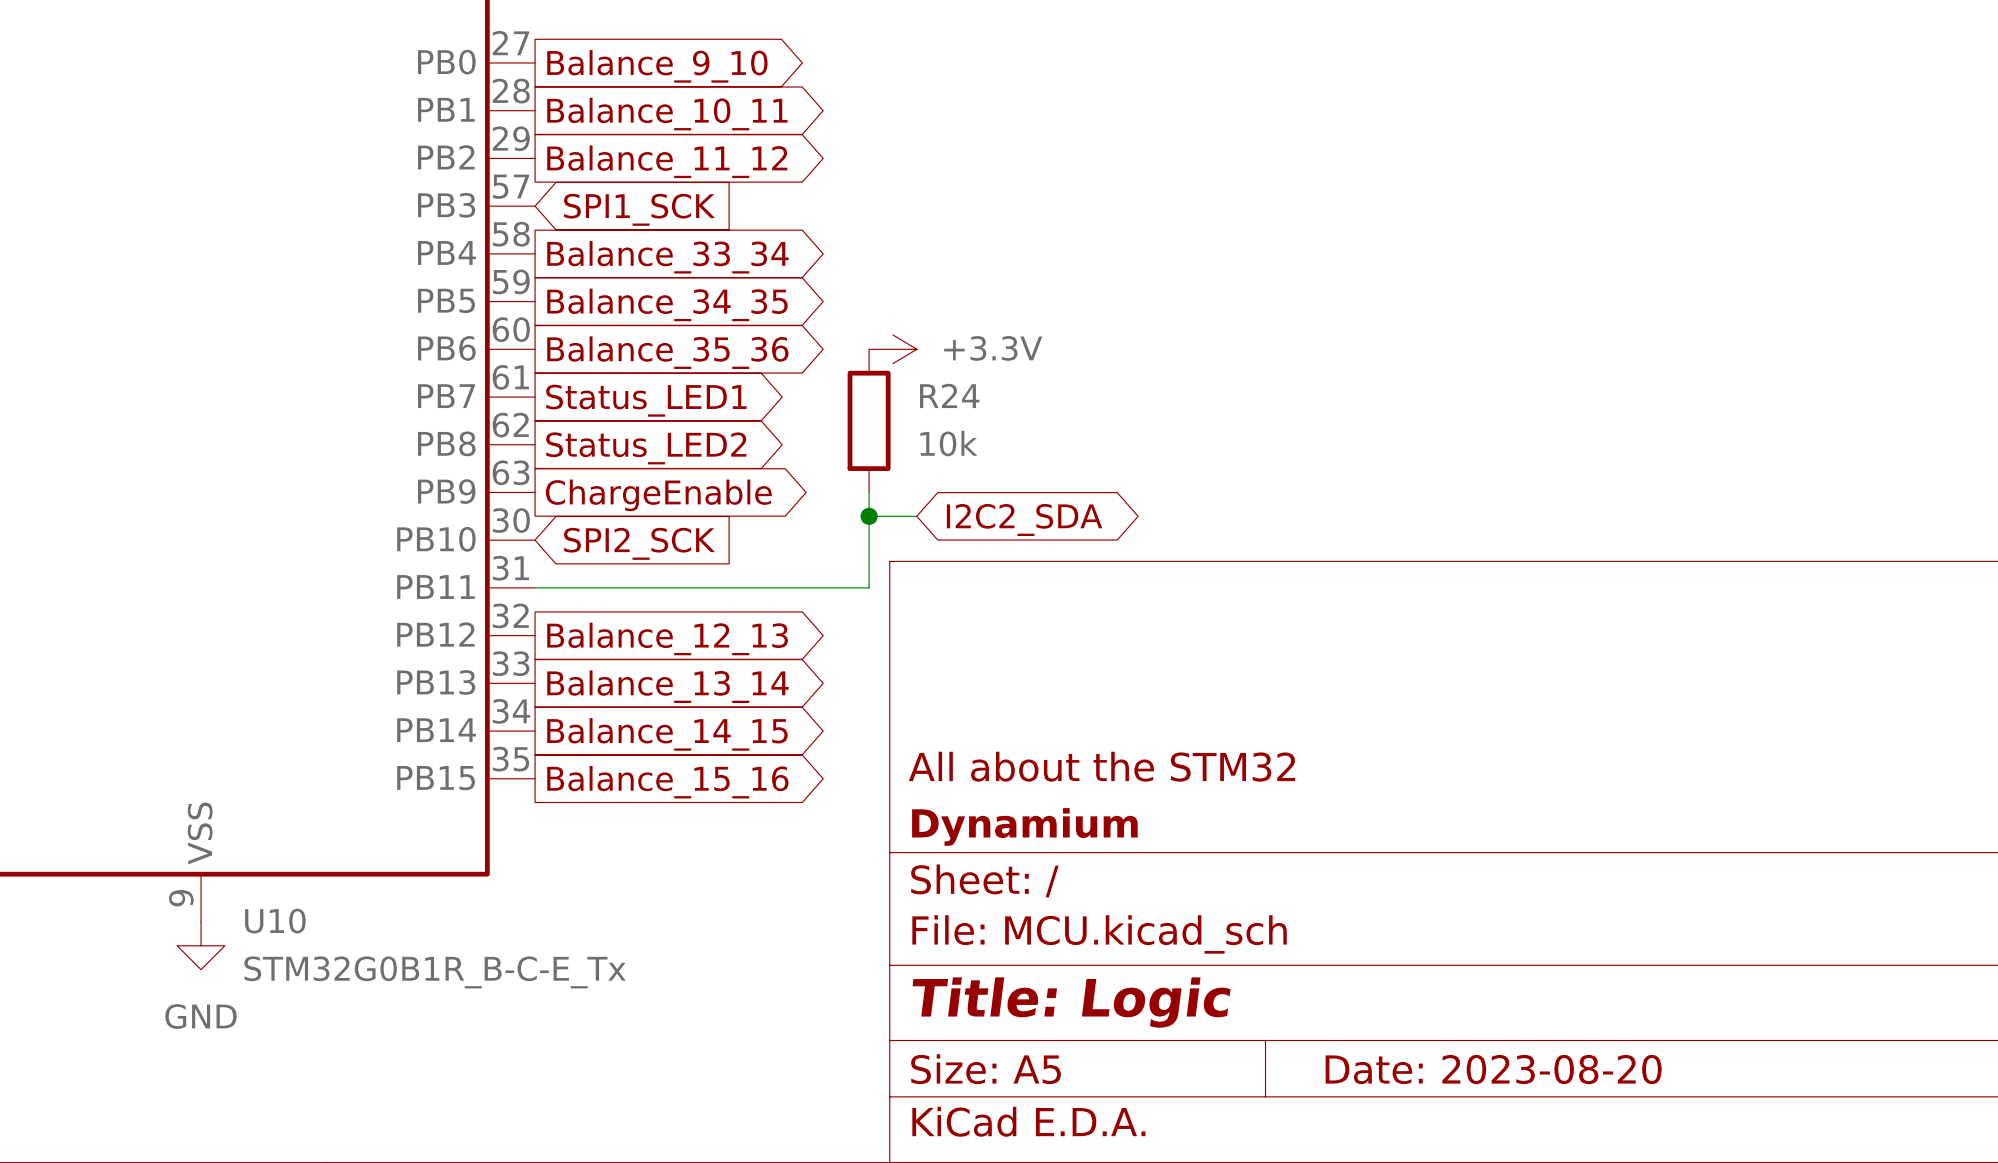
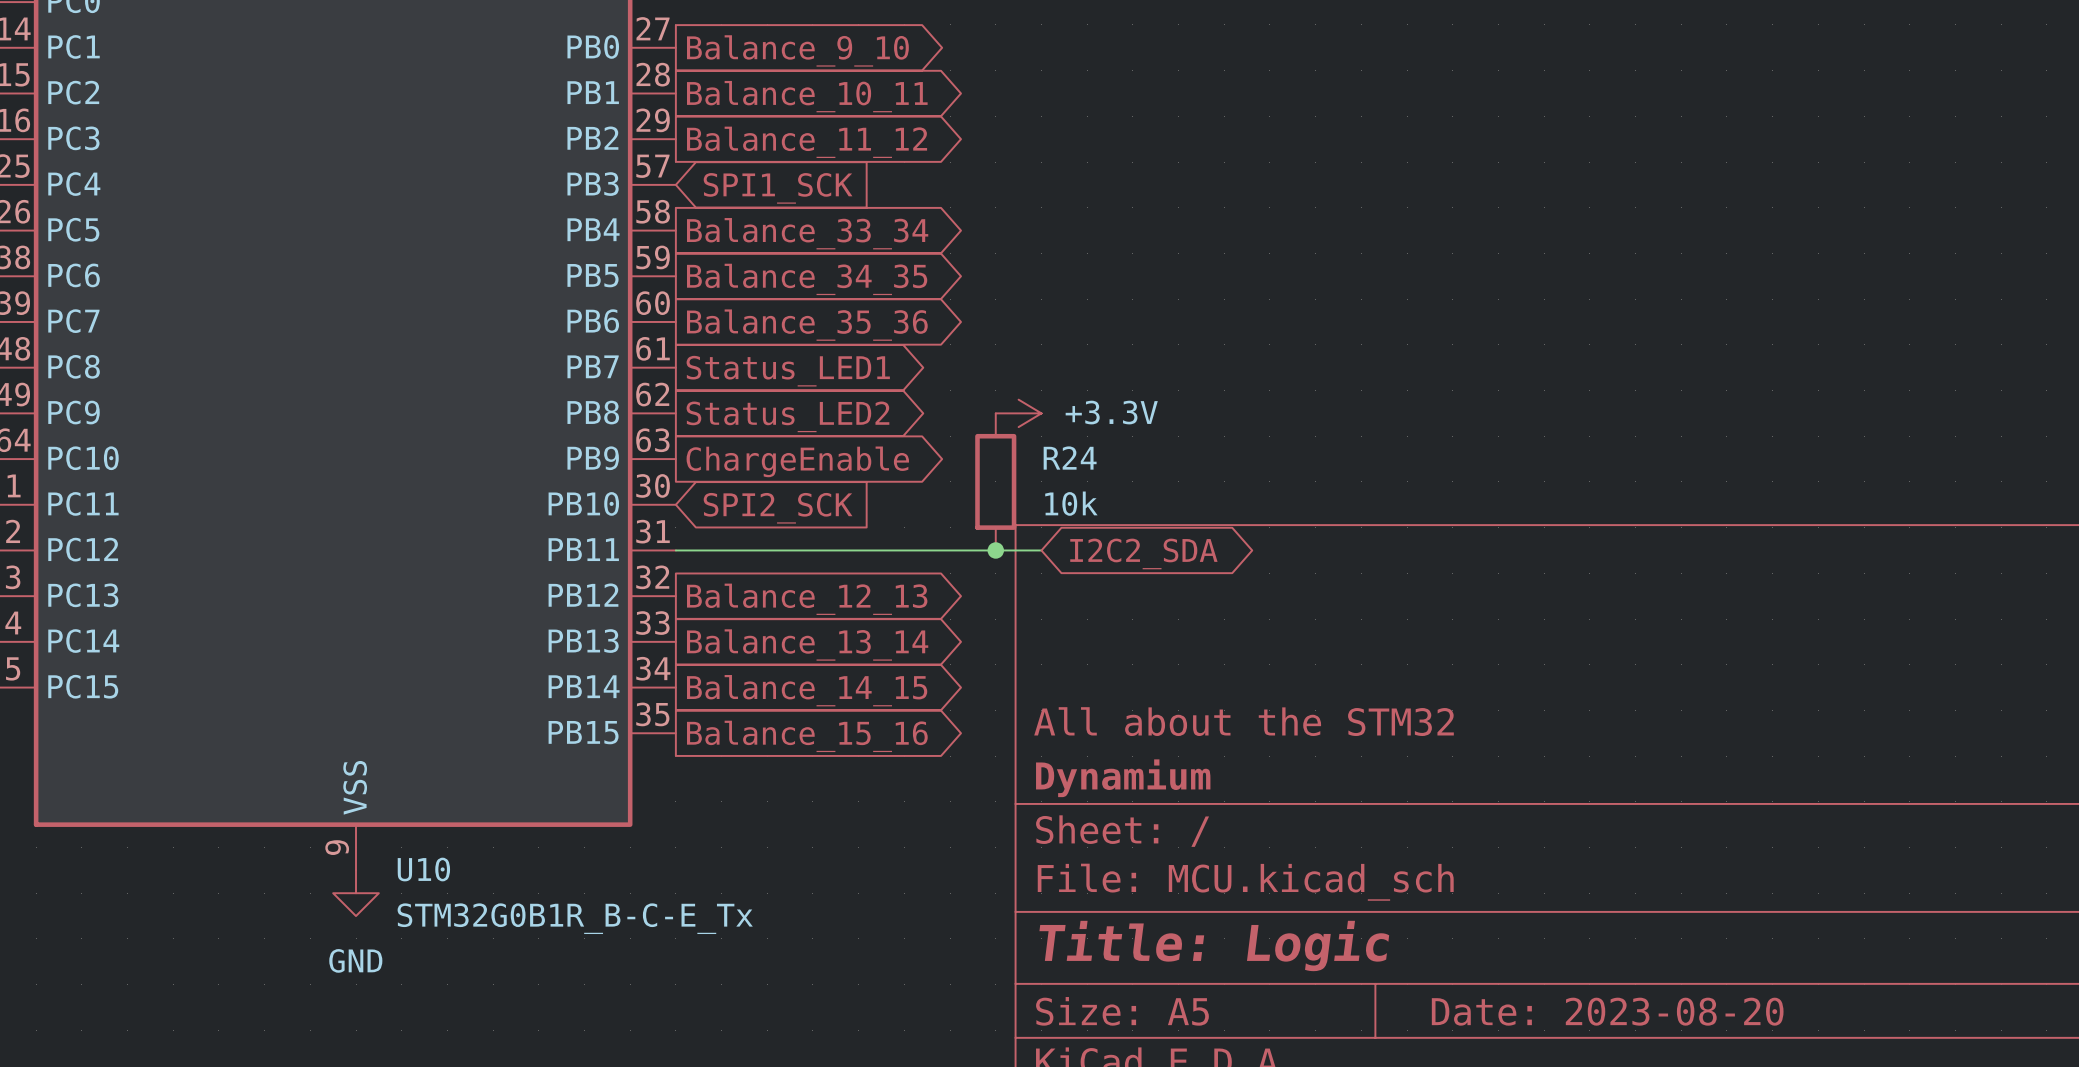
power symbol position: +3.3V (892, 349) -> +3.3V (1018, 413)
R24 position: (869, 420) -> (995, 481)
wire: (869, 492) (869, 587) -> (1041, 550) (995, 550)
wire: (869, 516) (916, 516) -> none
junction position: (869, 516) -> (995, 550)
global label position: I2C2_SDA (1024, 519) -> I2C2_SDA (1143, 553)

